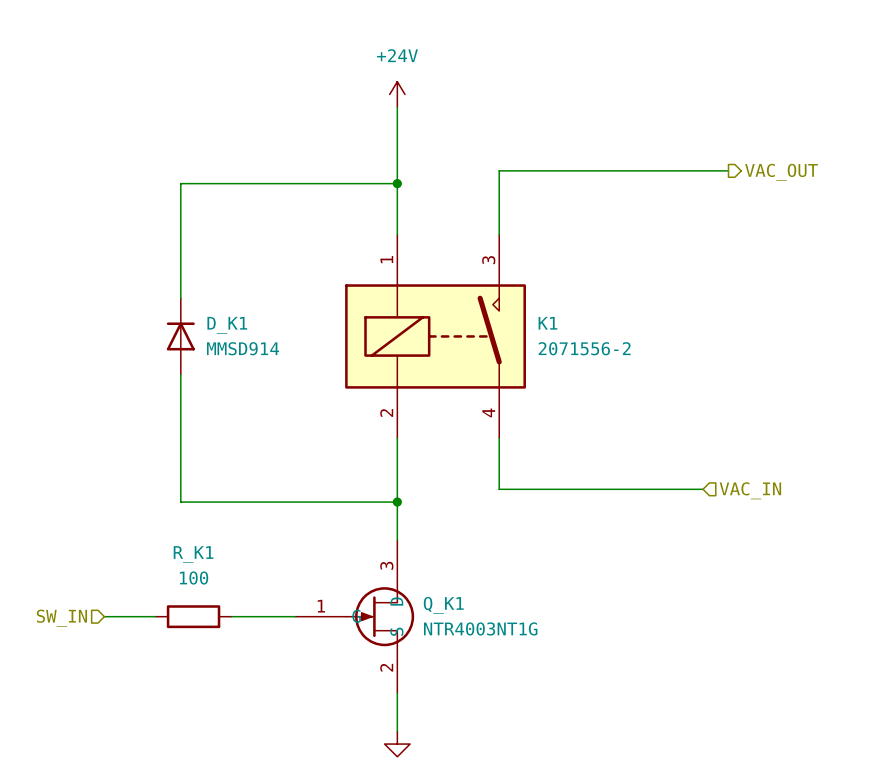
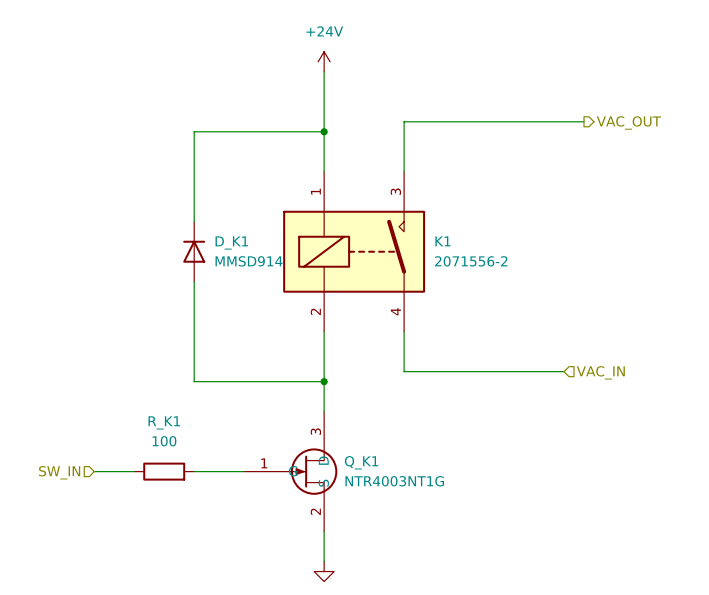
wire: (231, 183) (180, 183) (180, 298) -> (194, 131) (194, 221)
D_K1 position: (180, 336) -> (194, 251)
wire: (180, 374) (180, 502) (231, 502) -> (194, 281) (194, 381)

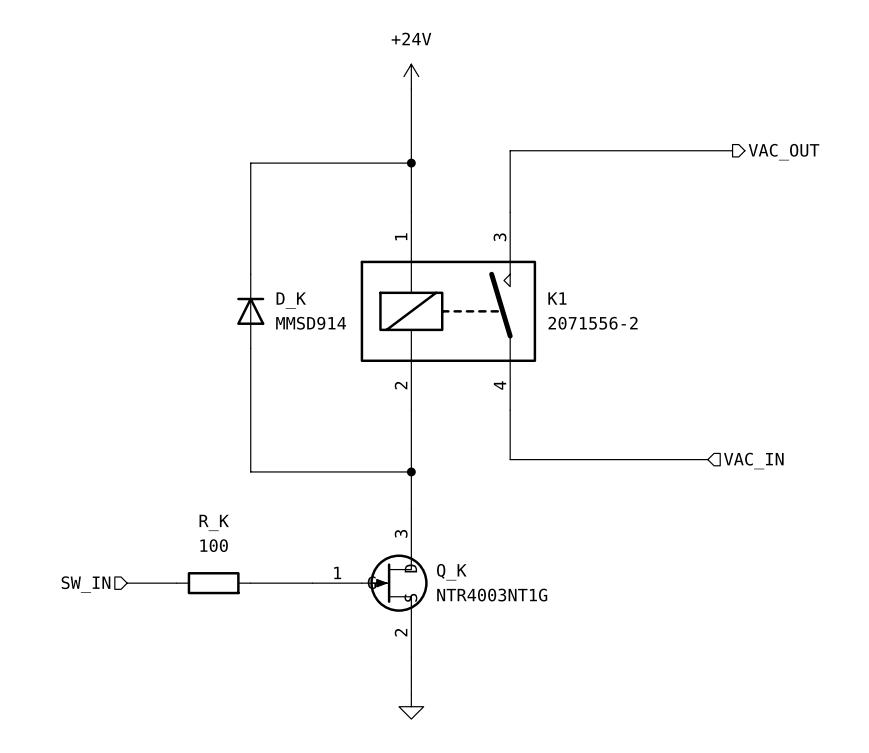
D_K1 name: D_K1 (231, 242) -> D_K (291, 300)
R_K1 name: R_K1 (164, 422) -> R_K (214, 522)
Q_K1 name: Q_K1 (361, 462) -> Q_K (451, 572)

